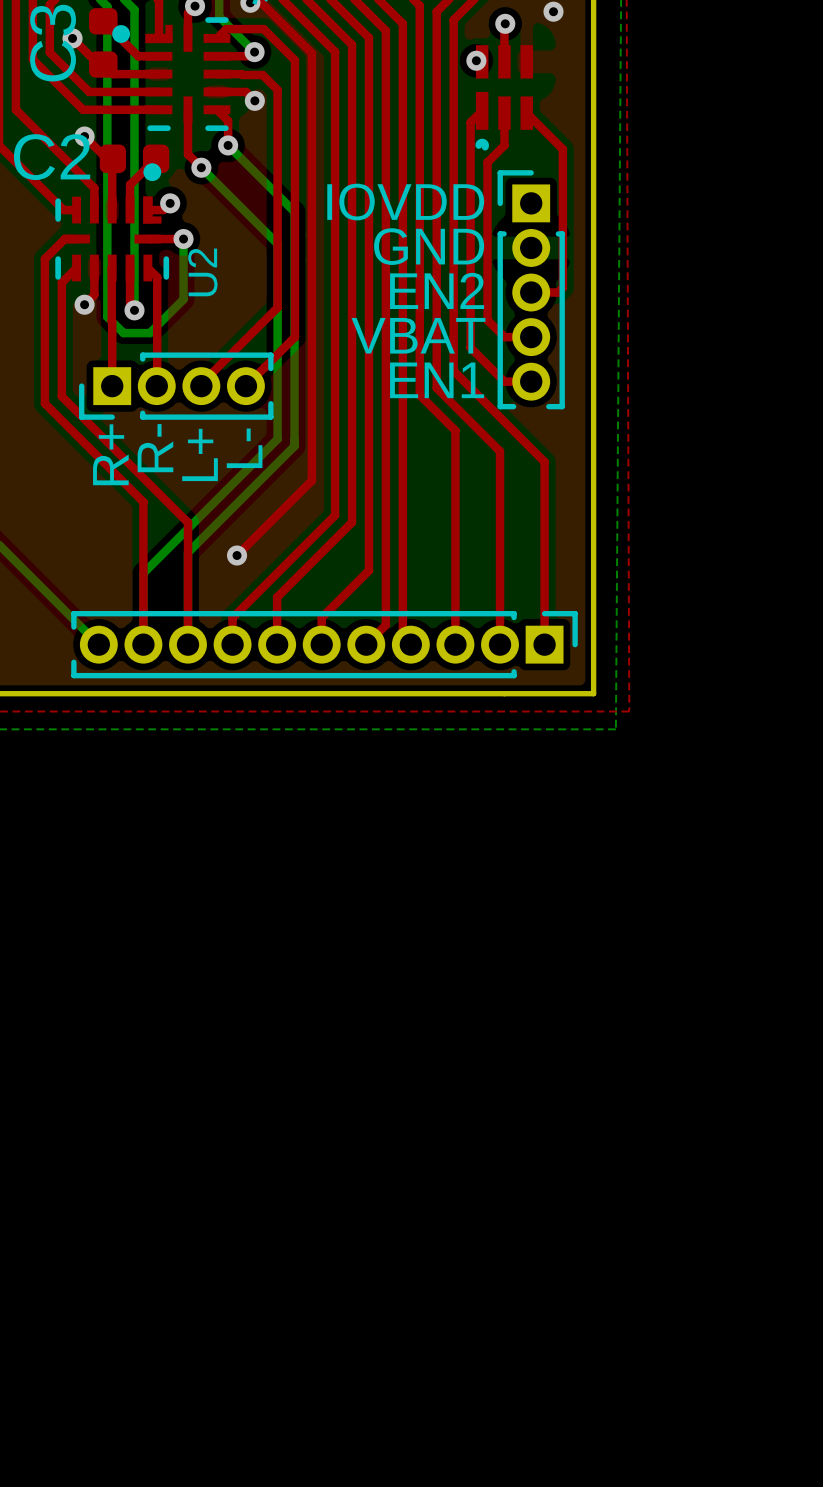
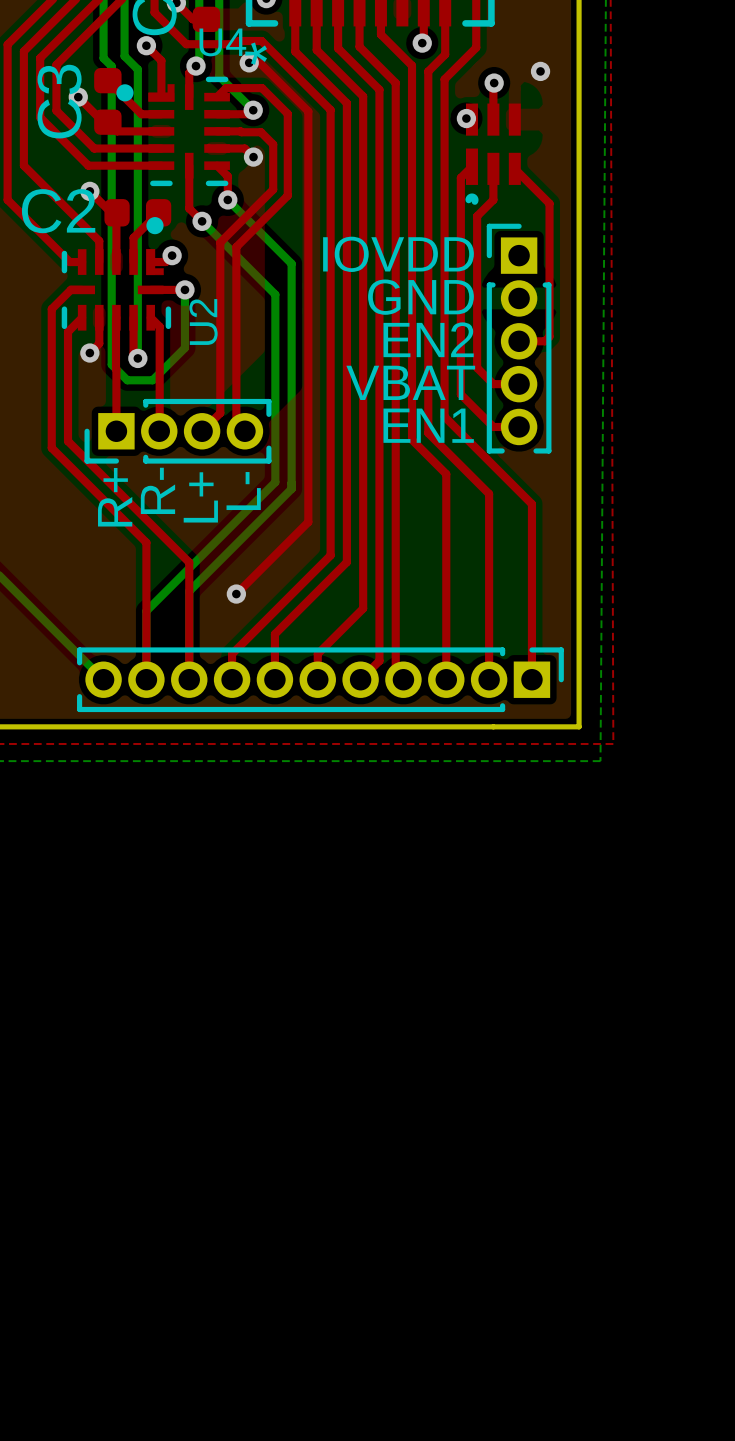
top track: (290, 55) (294, 60) (294, 337) (245, 386) -> (287, 113) (287, 195) (236, 247) (236, 422) (244, 431)
top track: (275, 87) (277, 89) (277, 307) (201, 383) (201, 386) -> (273, 144) (273, 189) (220, 242) (220, 413) (202, 431)

